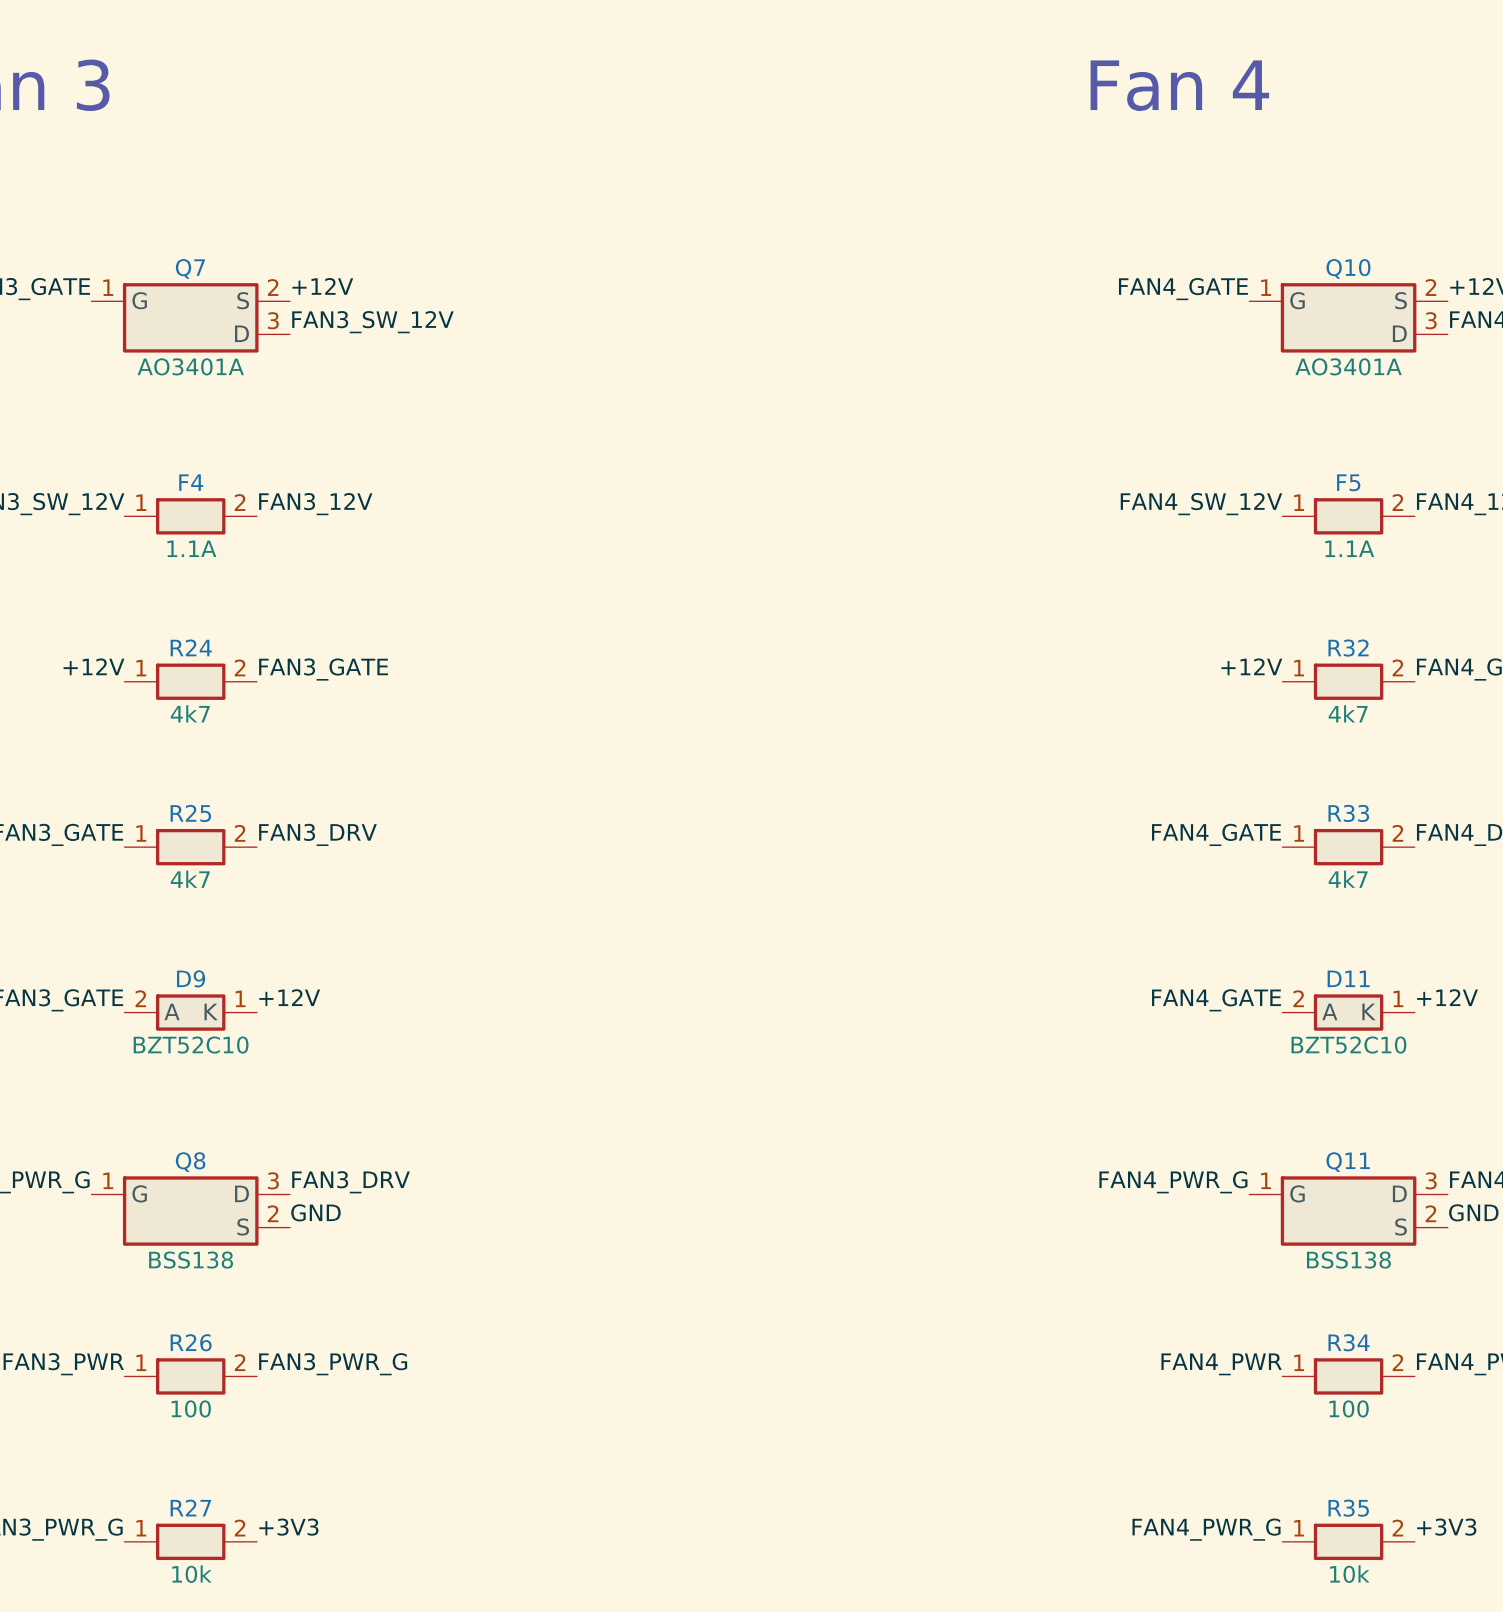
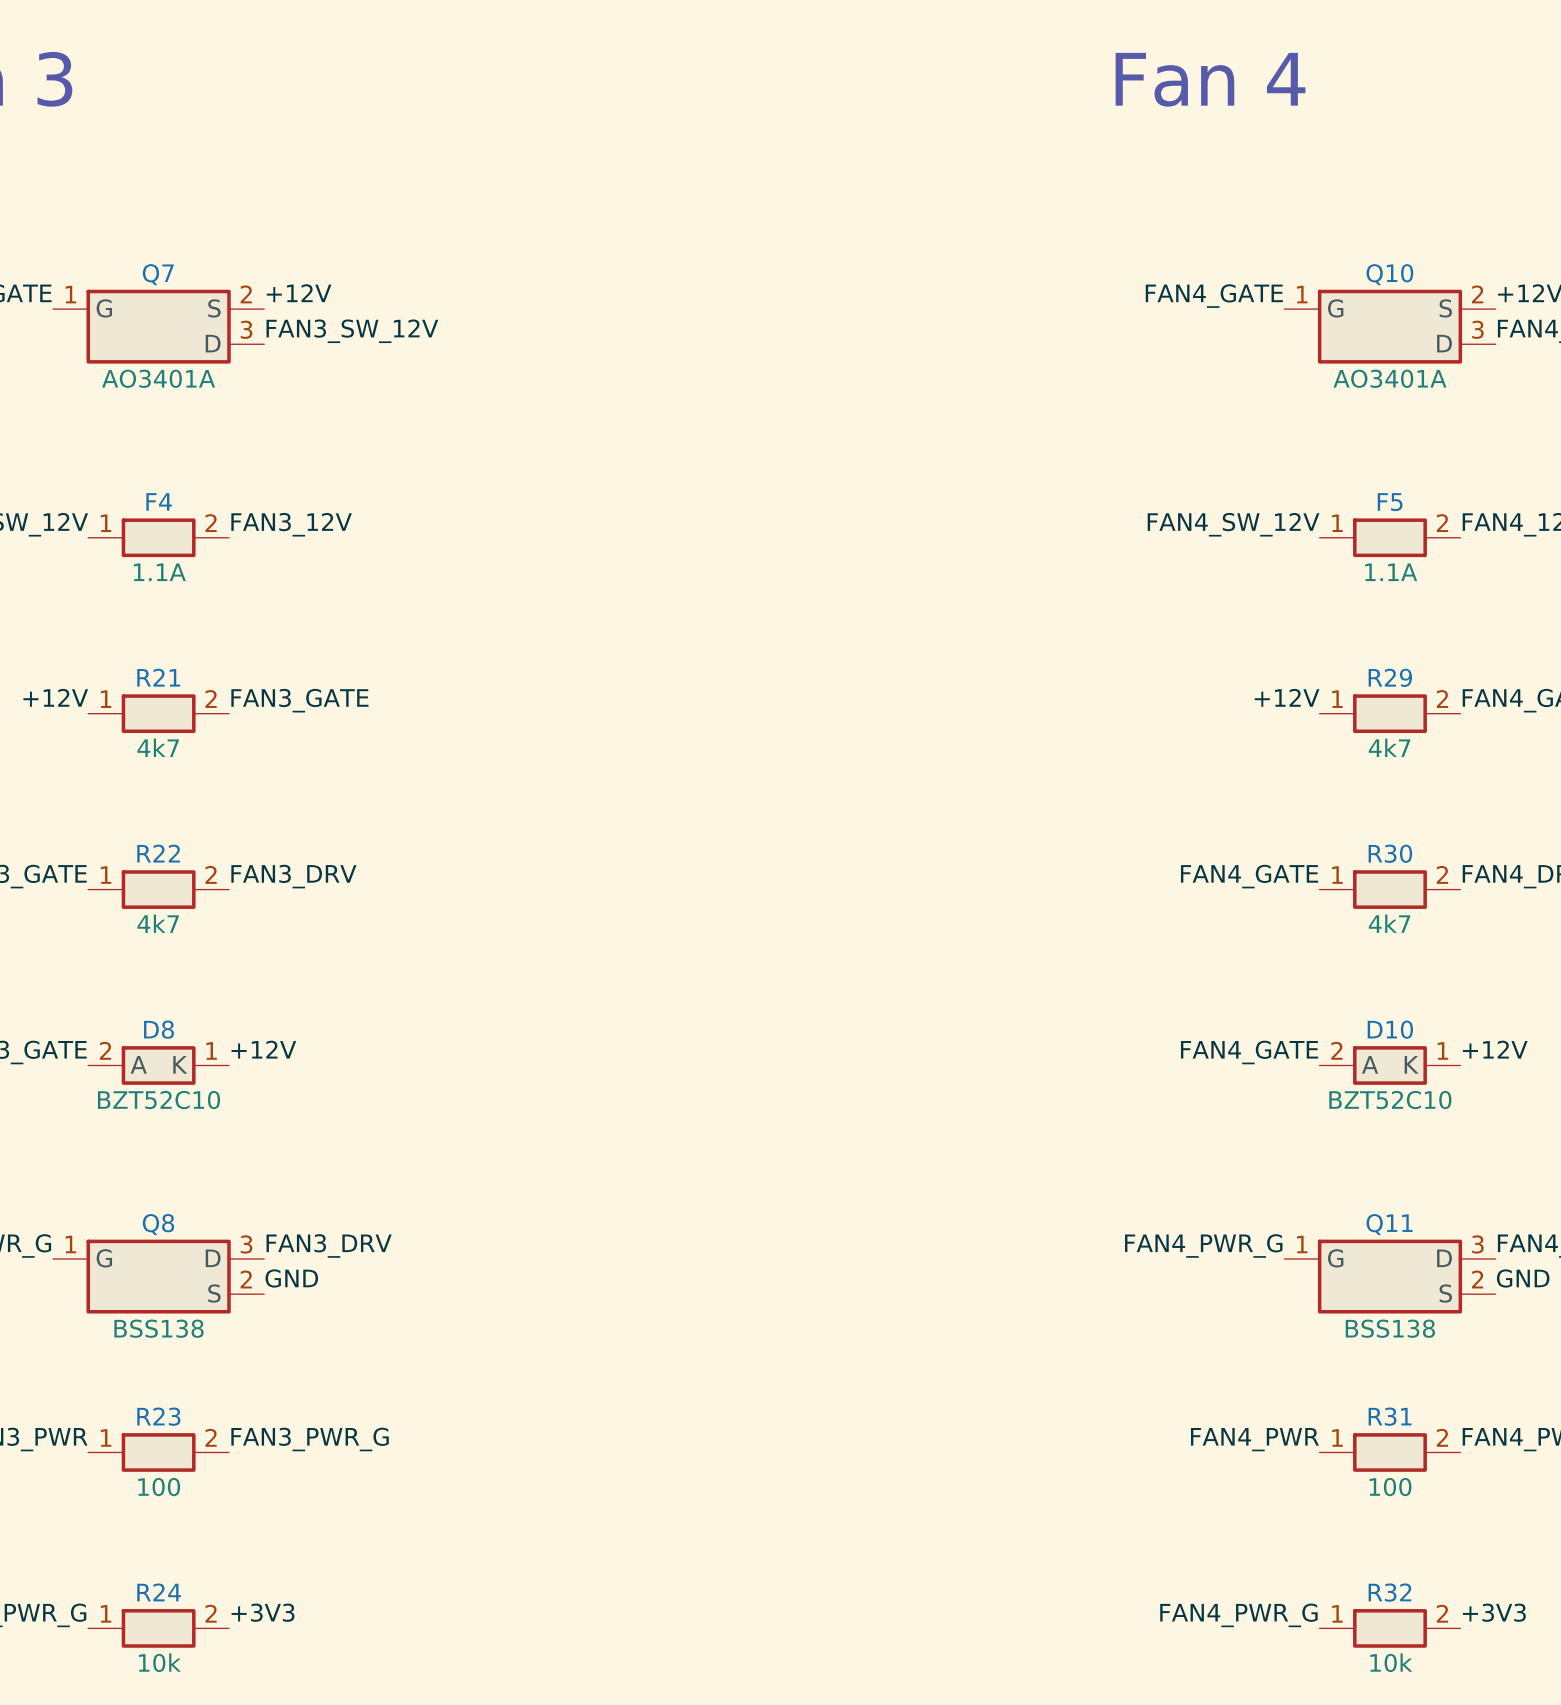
R24 name: R24 (191, 647) -> R21 (158, 677)
R32 name: R32 (1348, 648) -> R29 (1390, 677)
R25 name: R25 (190, 813) -> R22 (158, 853)
R33 name: R33 (1348, 813) -> R30 (1390, 853)
D9 name: D9 (191, 978) -> D8 (158, 1029)
D11 name: D11 (1348, 978) -> D10 (1390, 1029)
R26 name: R26 (191, 1342) -> R23 (158, 1416)
R34 name: R34 (1349, 1342) -> R31 (1390, 1416)
R27 name: R27 (190, 1508) -> R24 (159, 1592)
R35 name: R35 (1348, 1508) -> R32 (1389, 1592)

